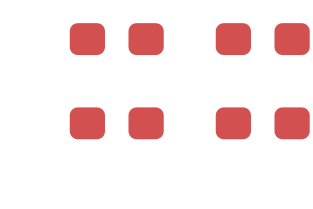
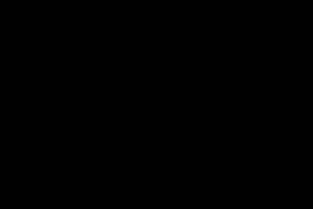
part: (116, 39) -> none
part: (262, 39) -> none
part: (116, 123) -> none
part: (262, 123) -> none

